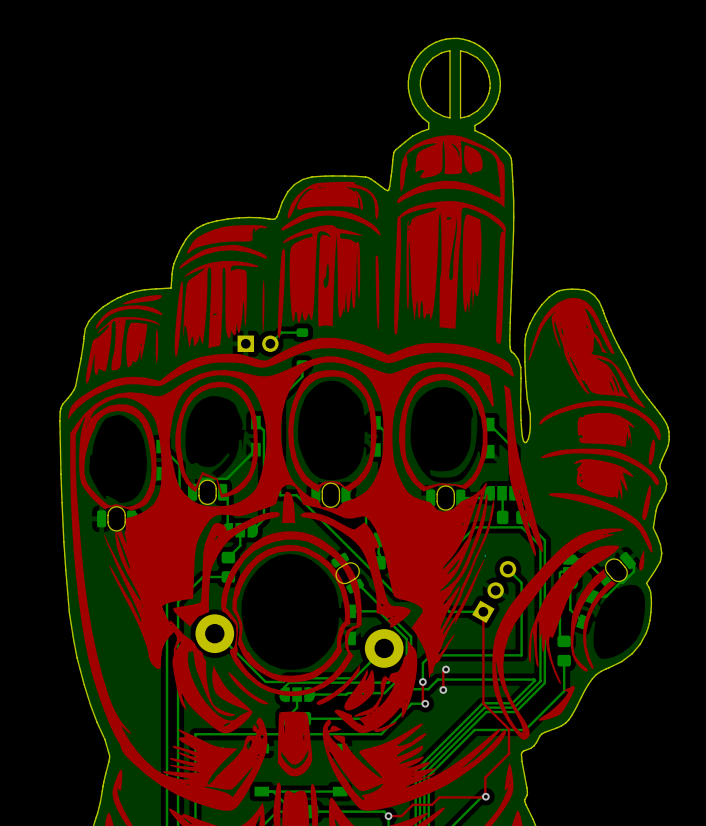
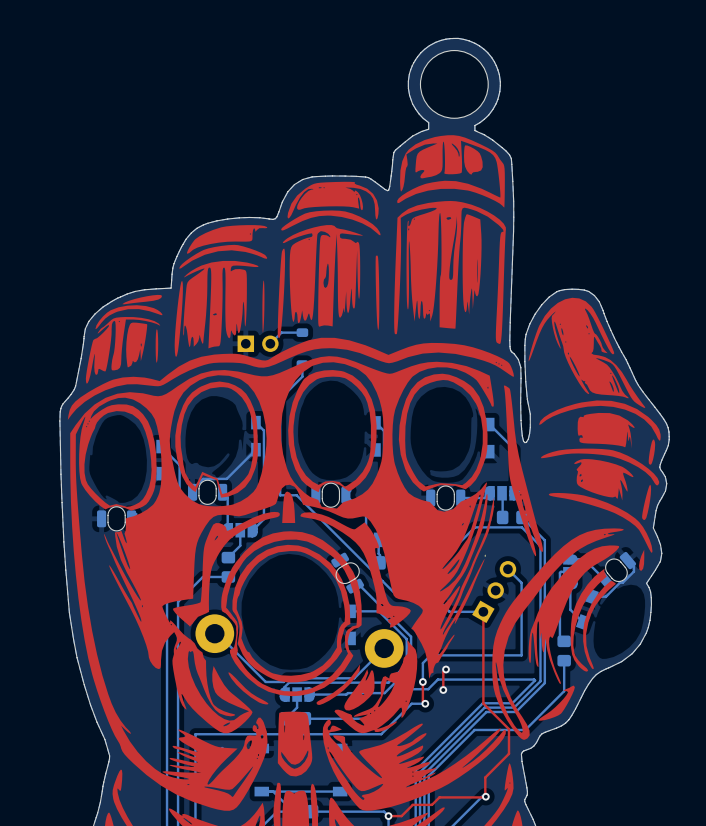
round board edge: none -> [419, 50, 489, 119]
board edge: (449, 50) (441, 52) (427, 64) (421, 75) (420, 85) (423, 98) (428, 105) (433, 111) (449, 117) (449, 50) -> none
board edge: (460, 50) (476, 57) (482, 62) (487, 70) (490, 83) (488, 93) (483, 104) (469, 115) (460, 117) (460, 50) -> none

